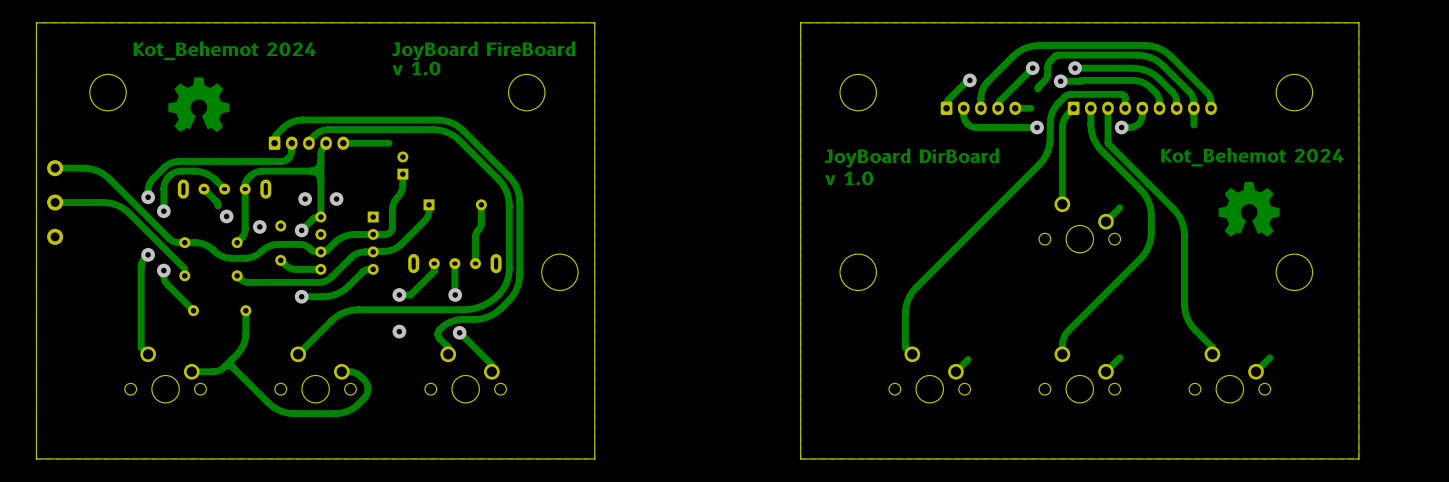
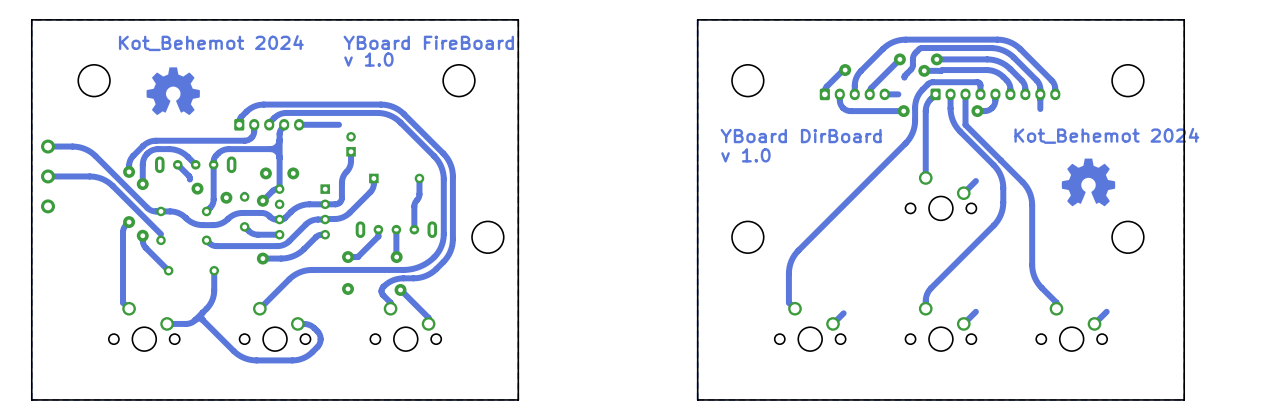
text: JoyBoard FireBoard (483, 50) -> YBoard FireBoard (428, 42)
text: JoyBoard DirBoard (911, 157) -> YBoard DirBoard (801, 136)

